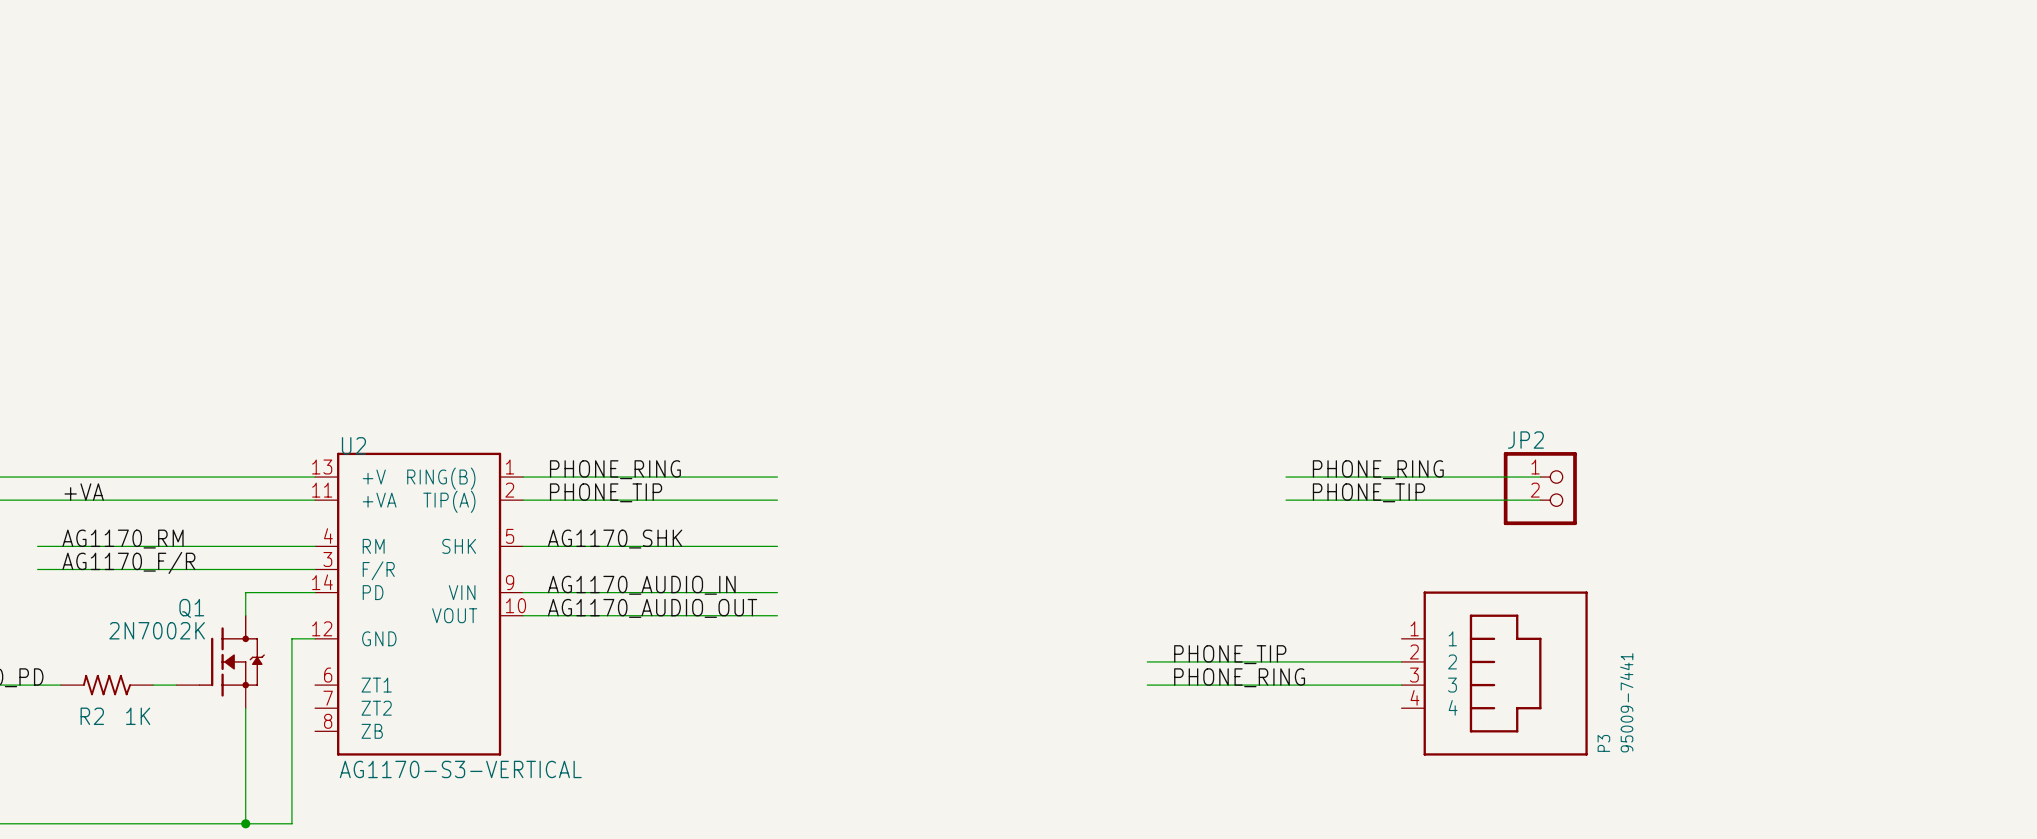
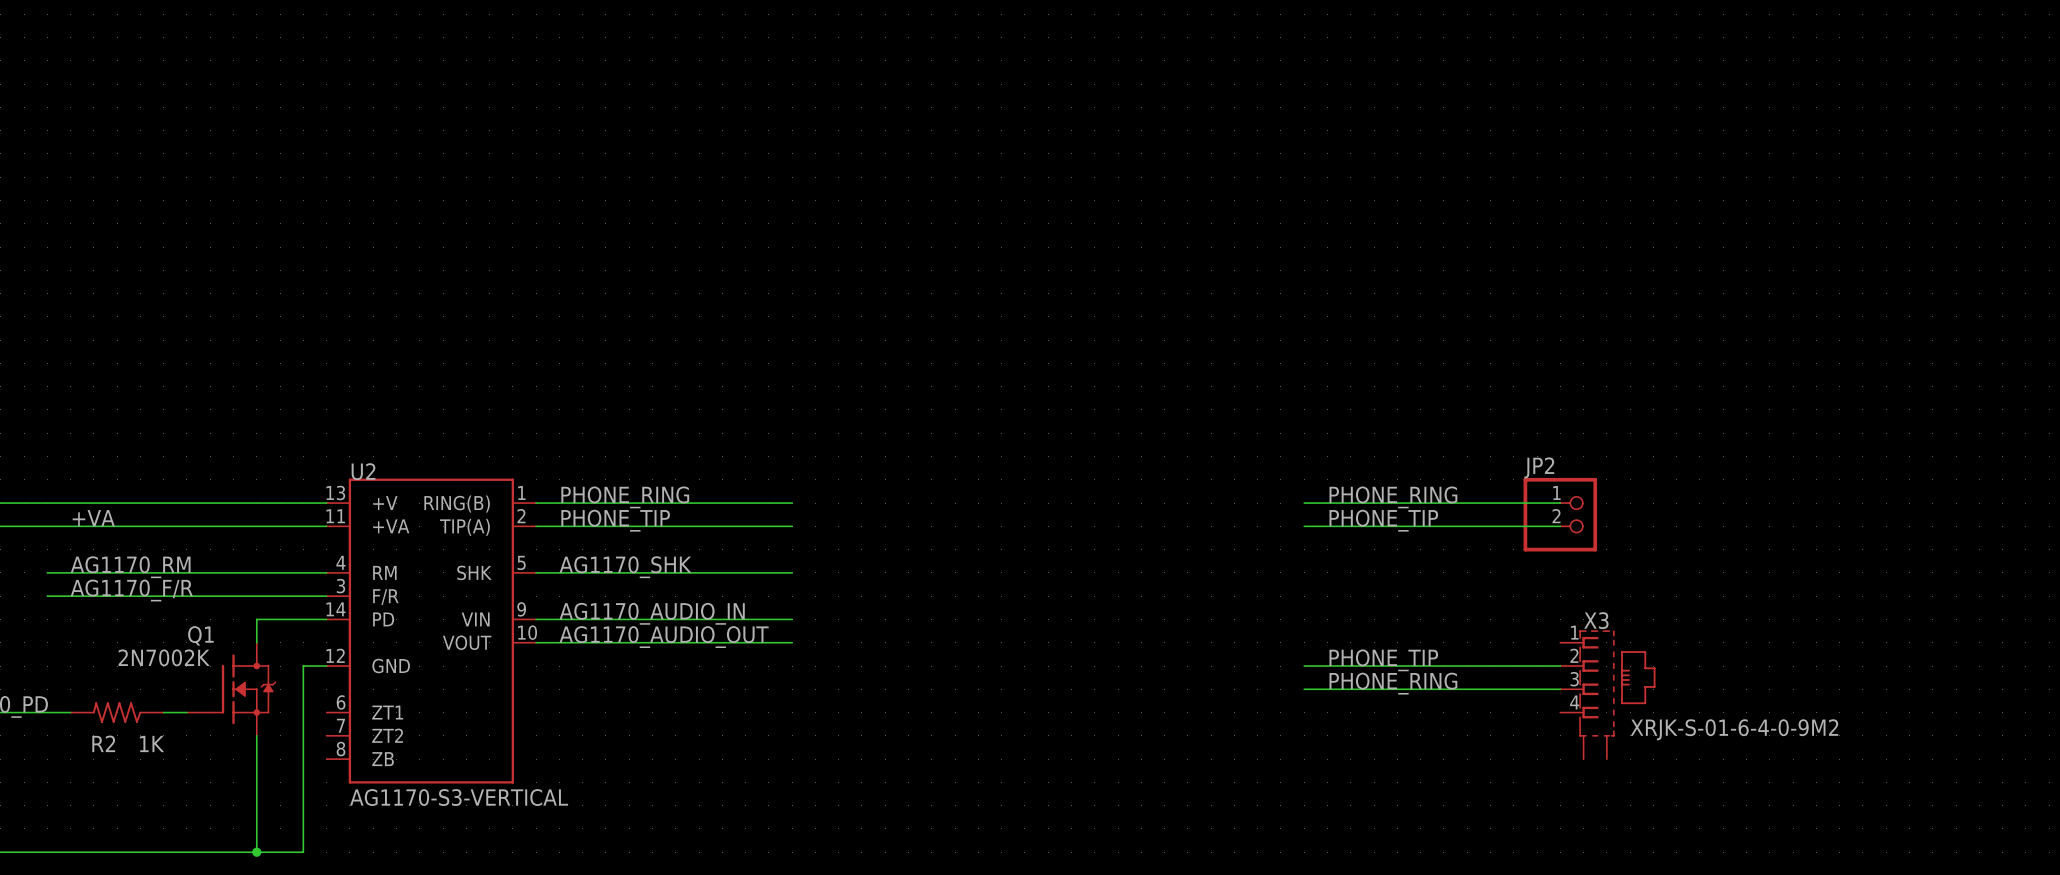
label position: PHONE_TIP (1230, 654) -> PHONE_TIP (1383, 660)
wire: (1147, 661) (1286, 661) -> none
wire: none -> (1420, 689) (1560, 689)
X3: none -> XRJK-S-01-6-4-0-9M2 (1607, 694)
P3: 95009-7441 (1494, 673) -> none
label position: PHONE_RING (1239, 677) -> PHONE_RING (1393, 683)
wire: (1147, 685) (1401, 685) -> (1304, 666) (1560, 666)

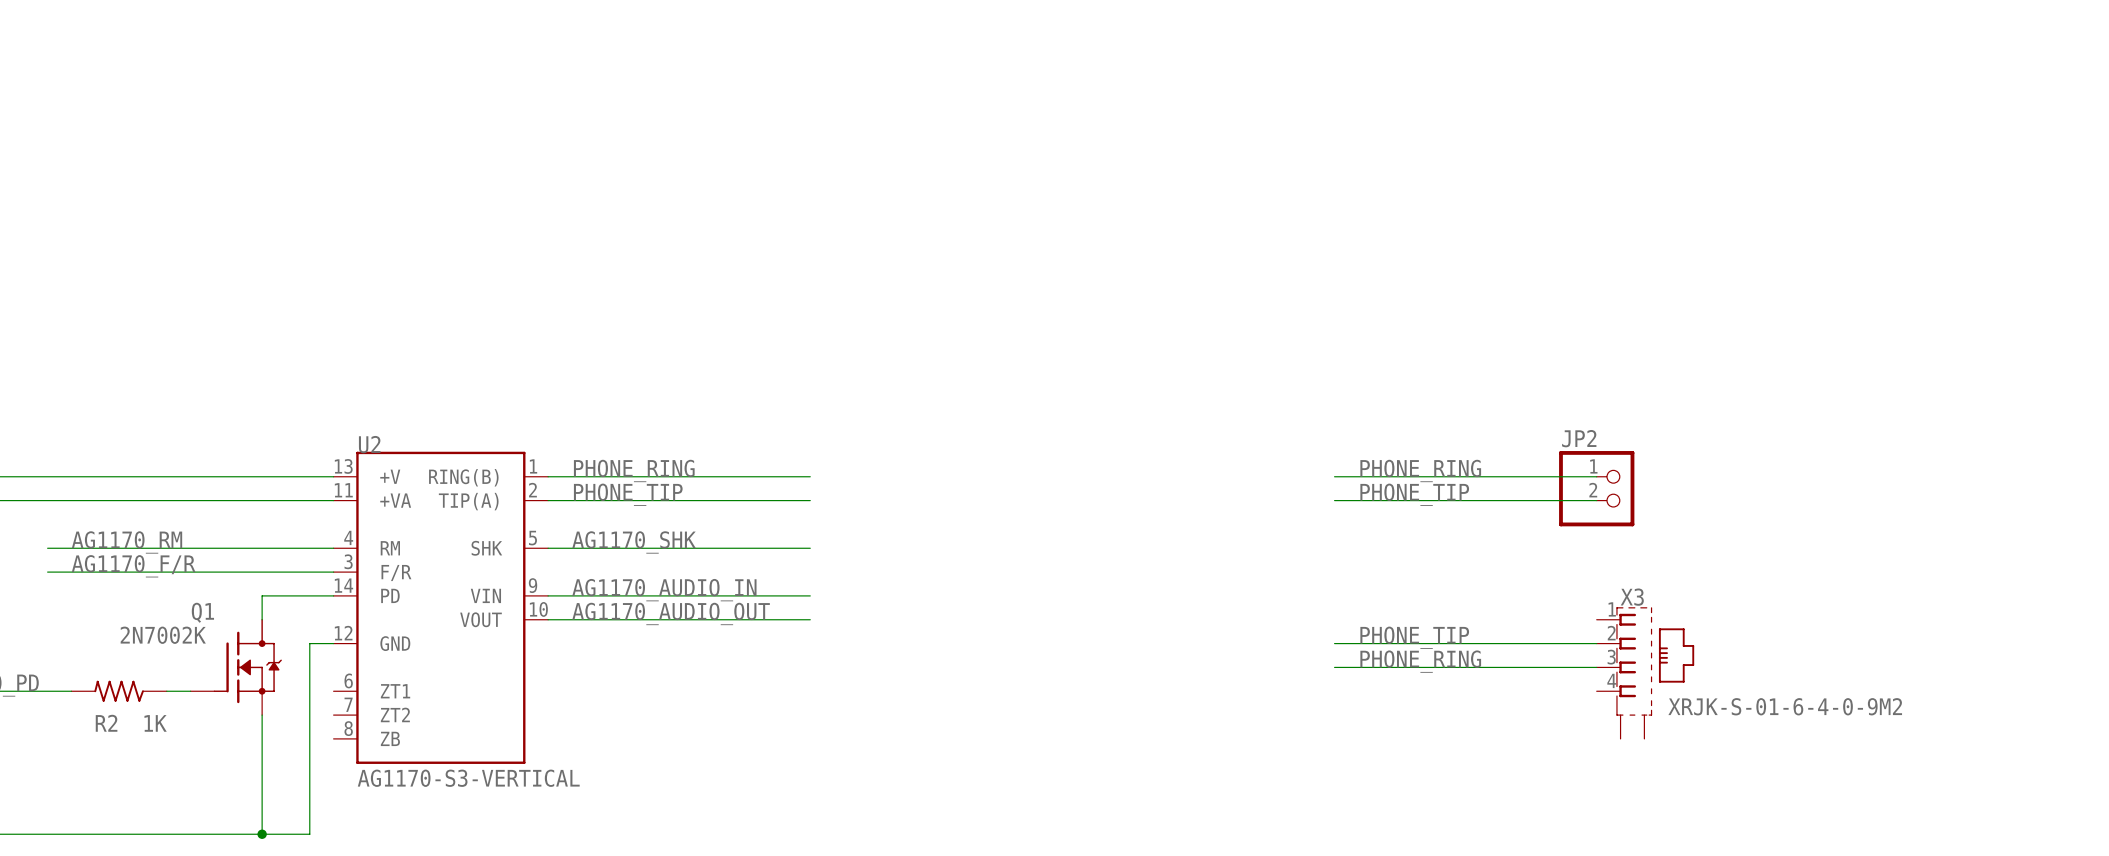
label: +VA (93, 518) -> none

